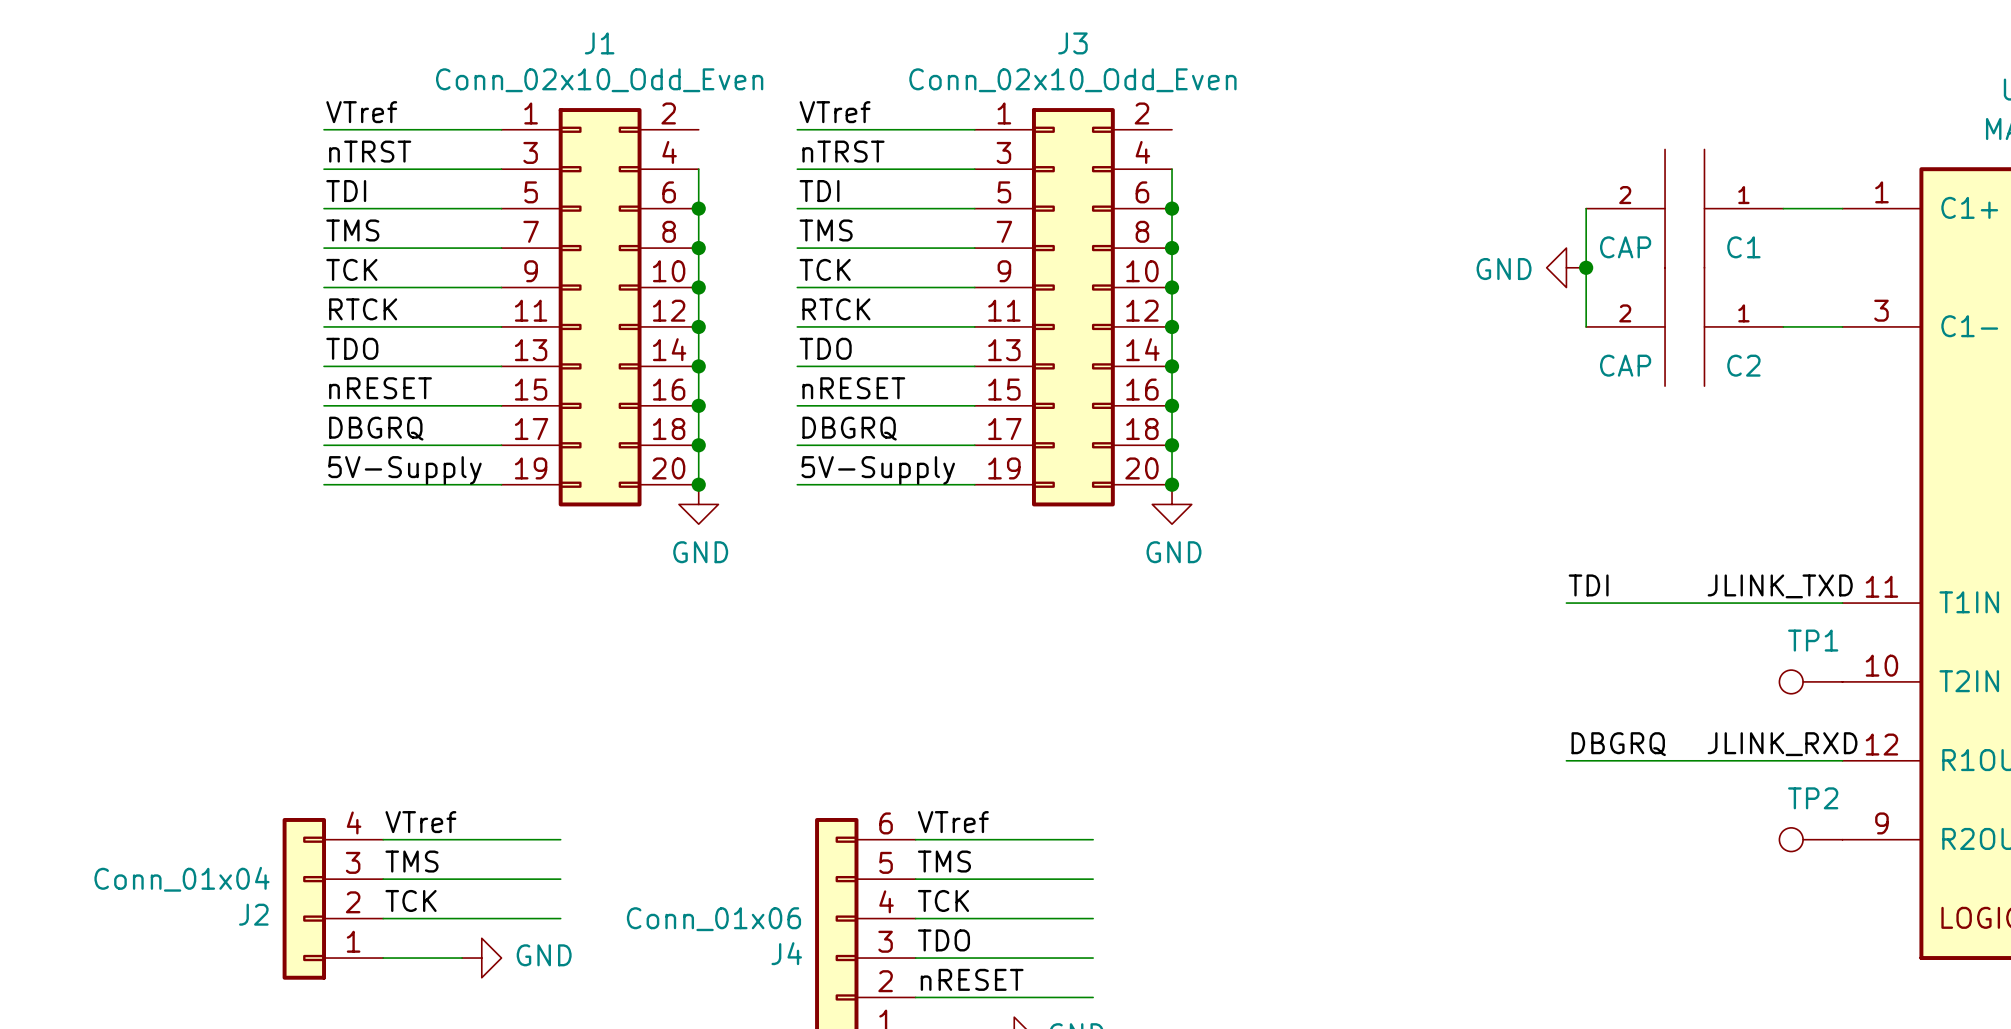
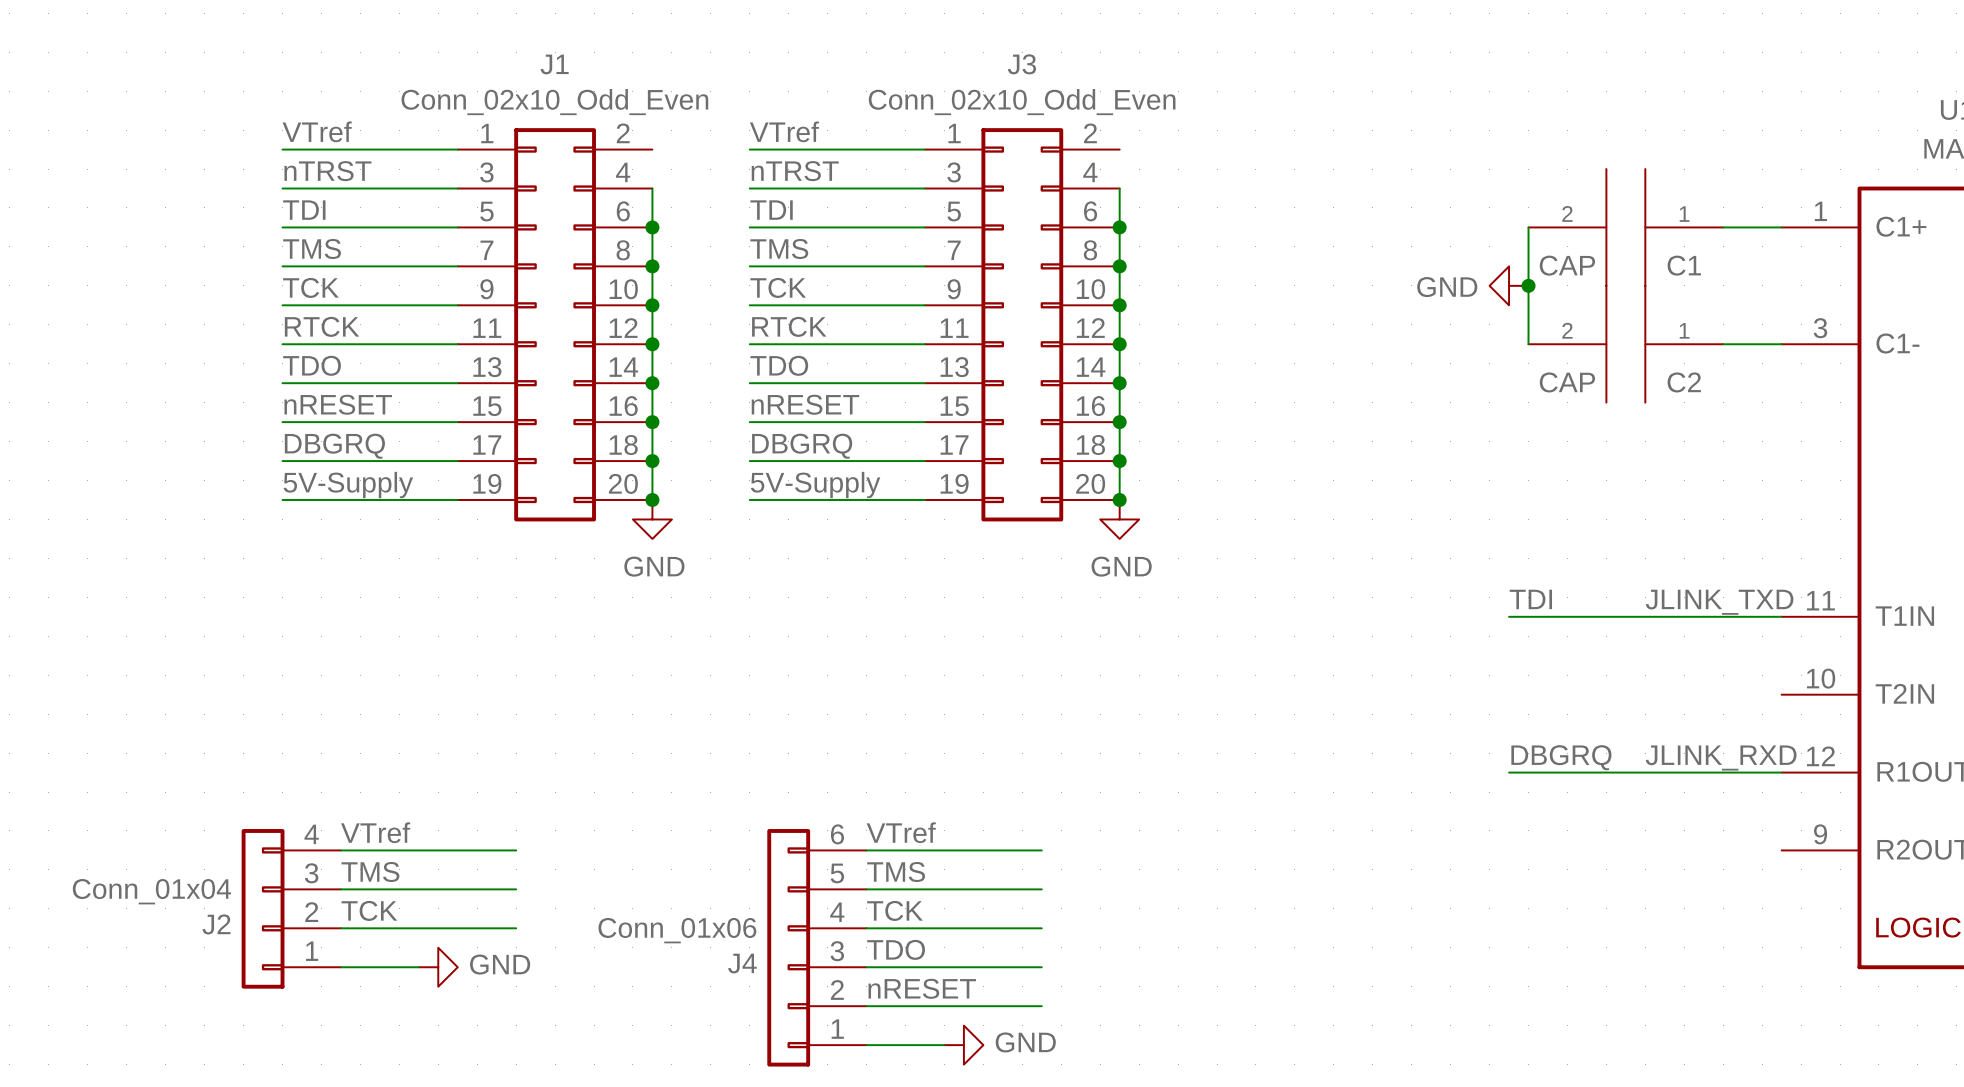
TP1: (1810, 681) -> none
TP2: (1810, 839) -> none

